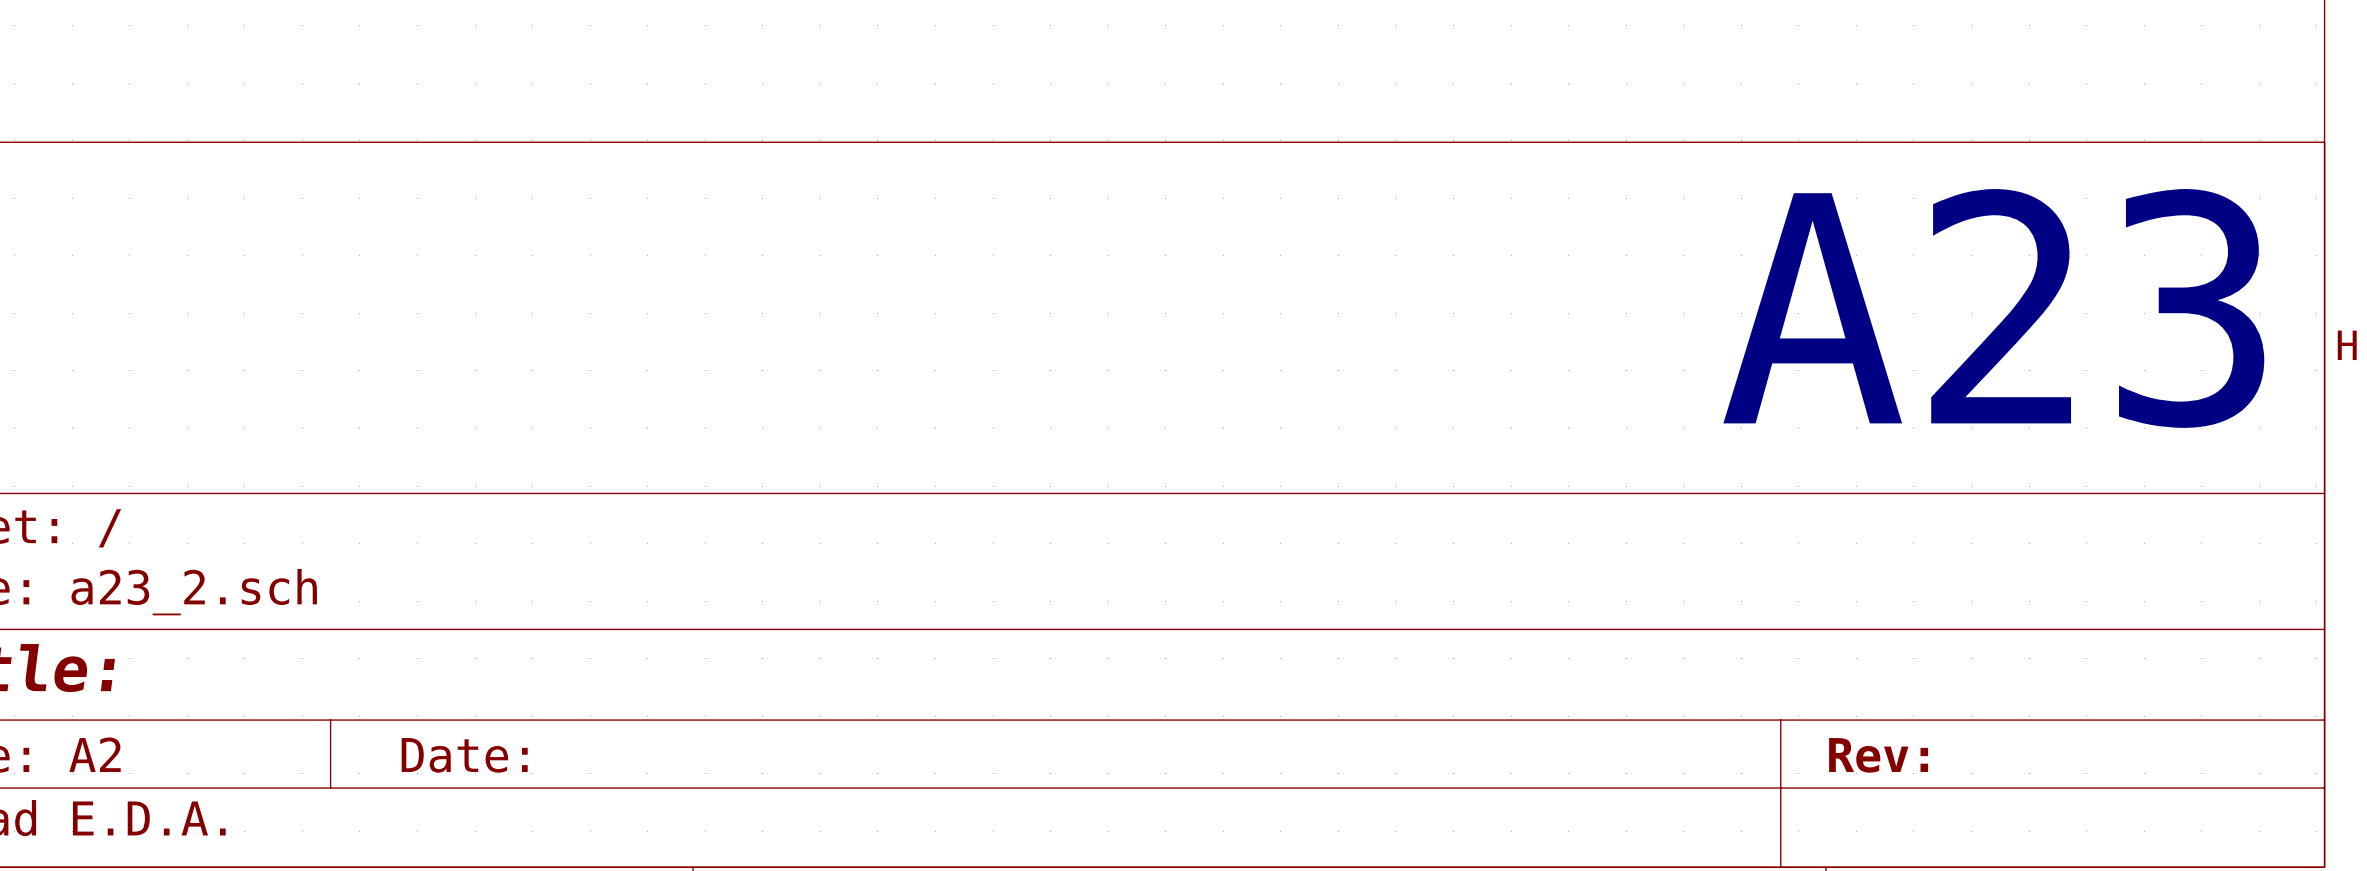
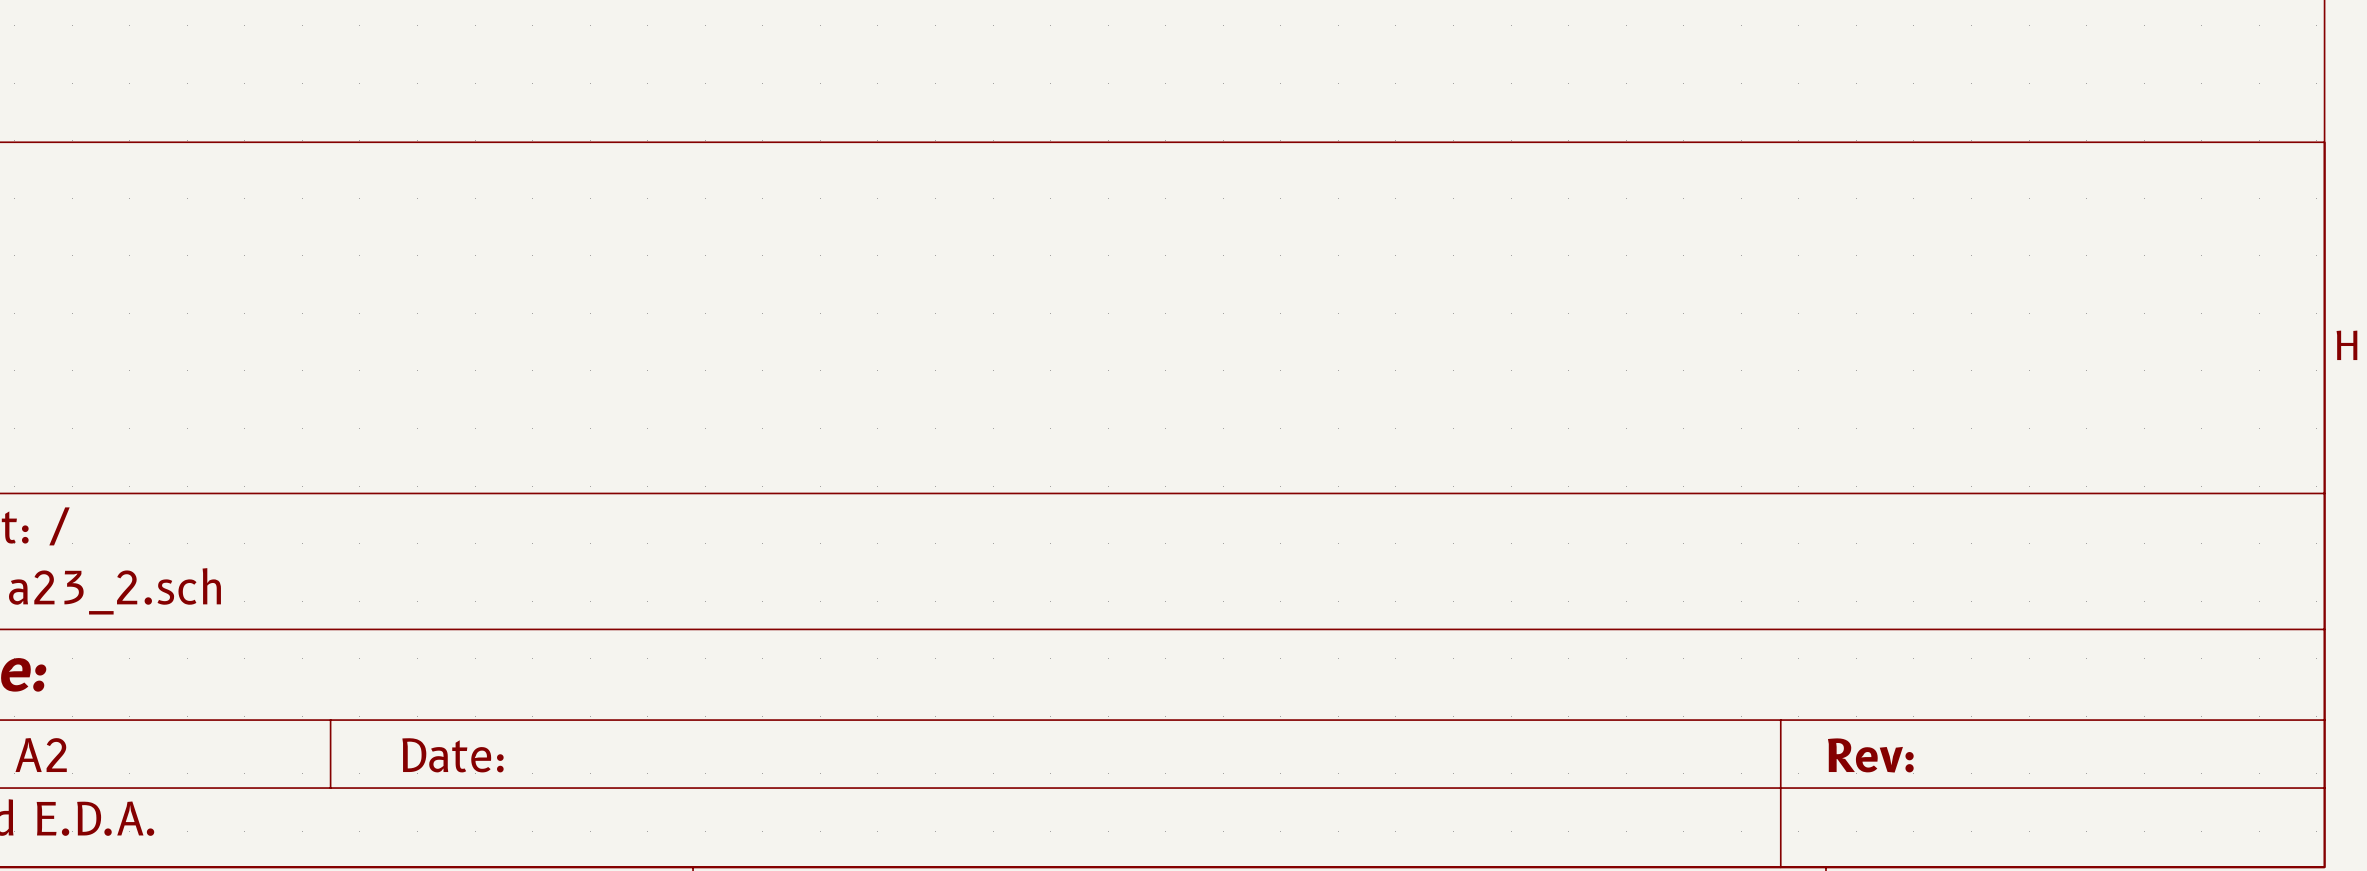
text: A23 (1993, 308) -> none

